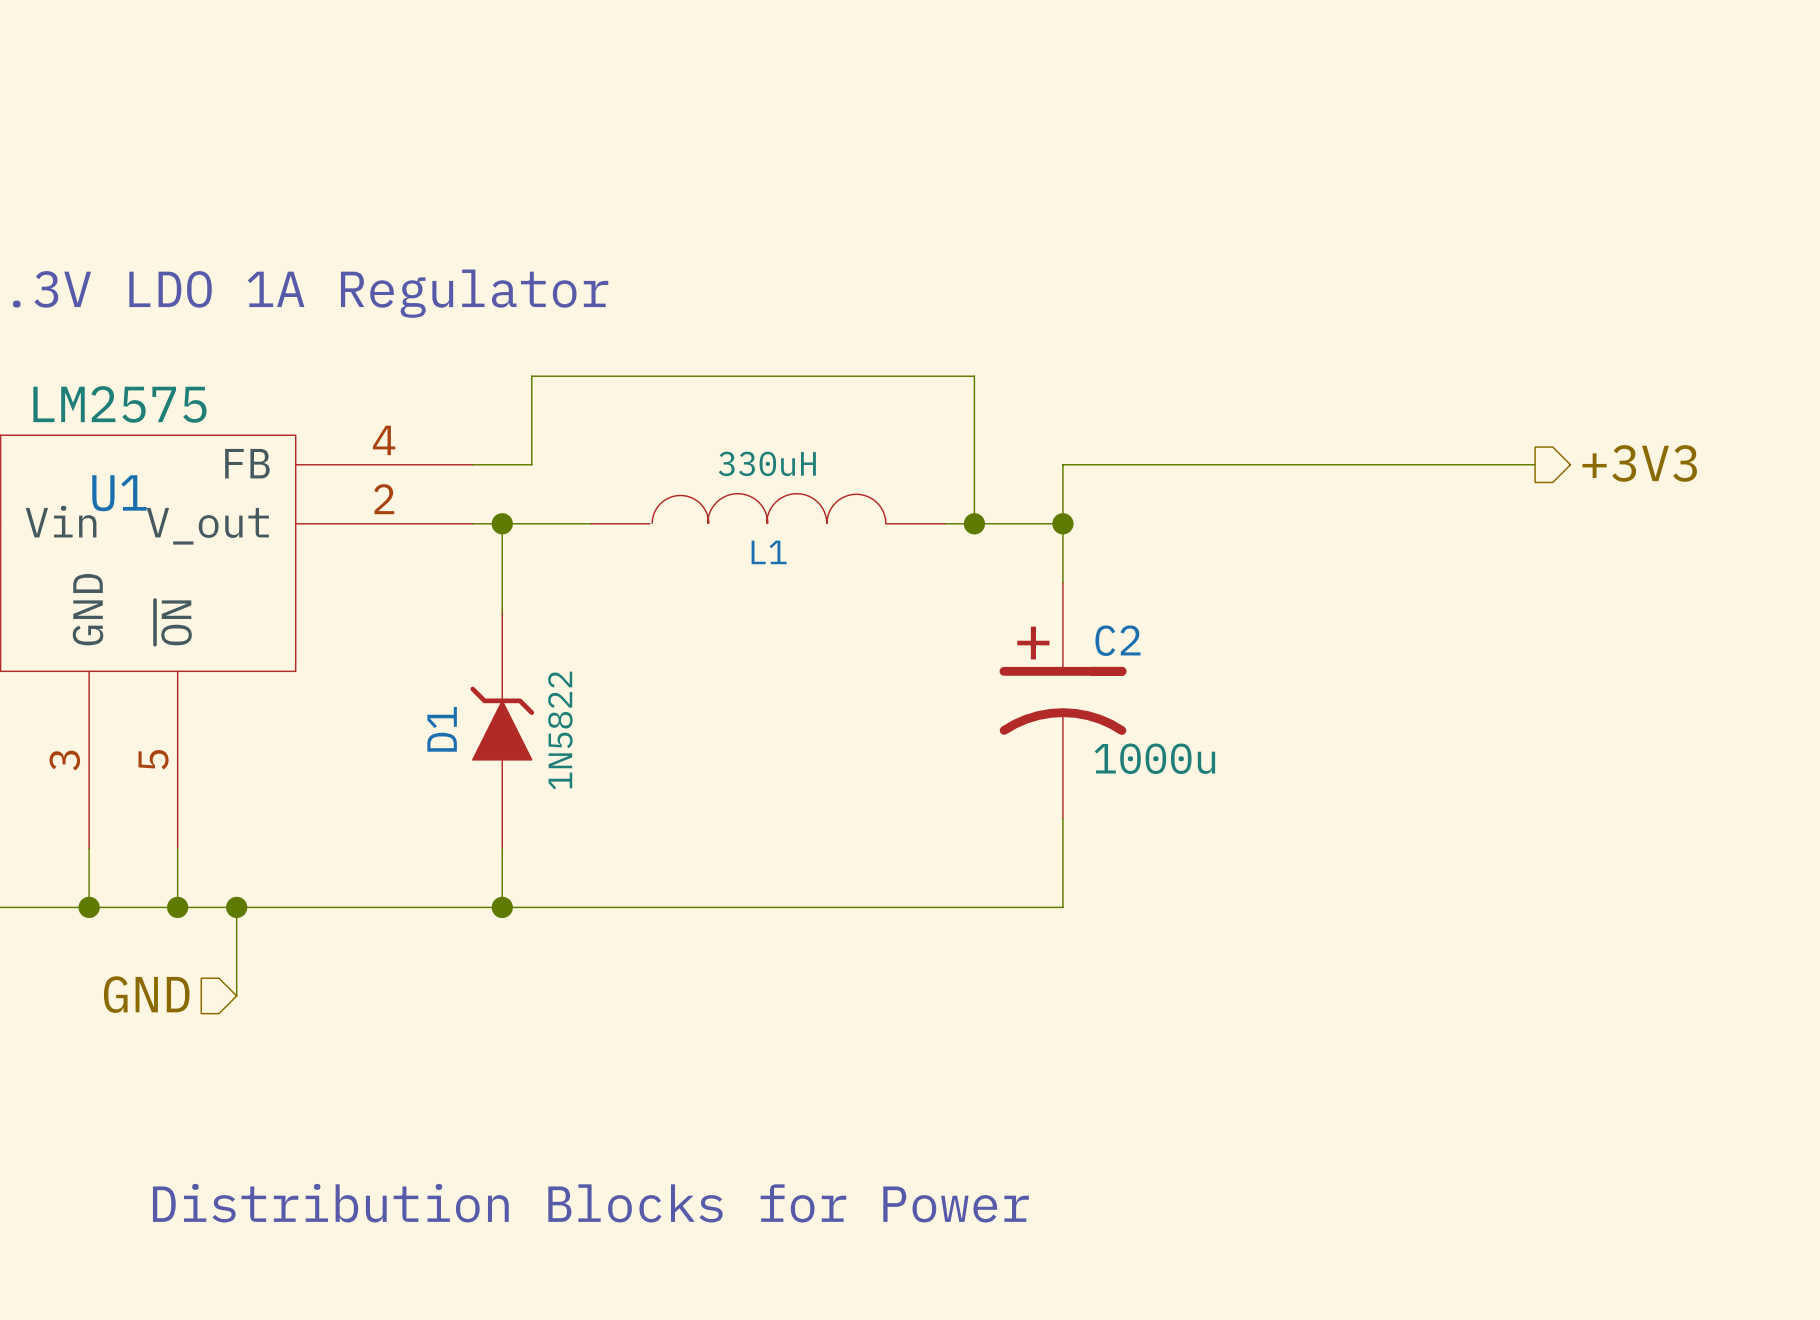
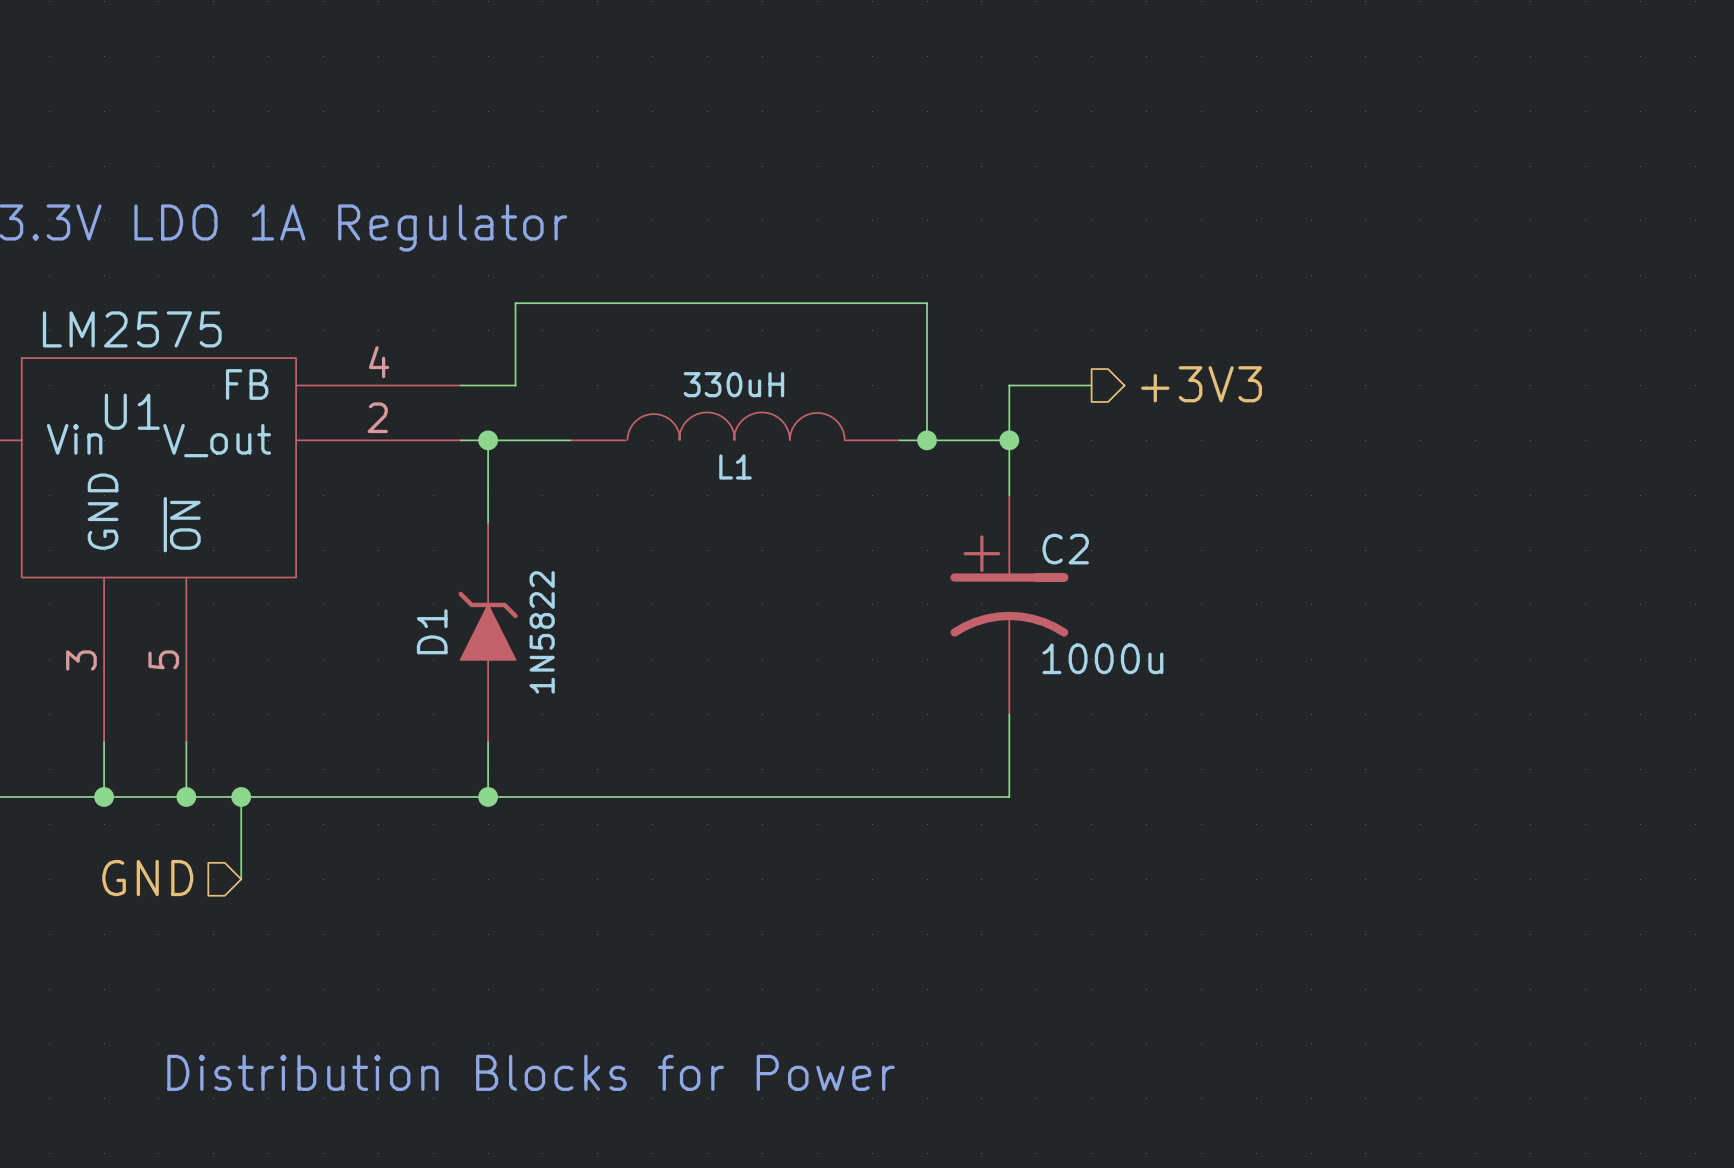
hierarchical label position: +3V3 (1639, 463) -> +3V3 (1201, 384)
wire: (1151, 464) (1535, 464) -> none

